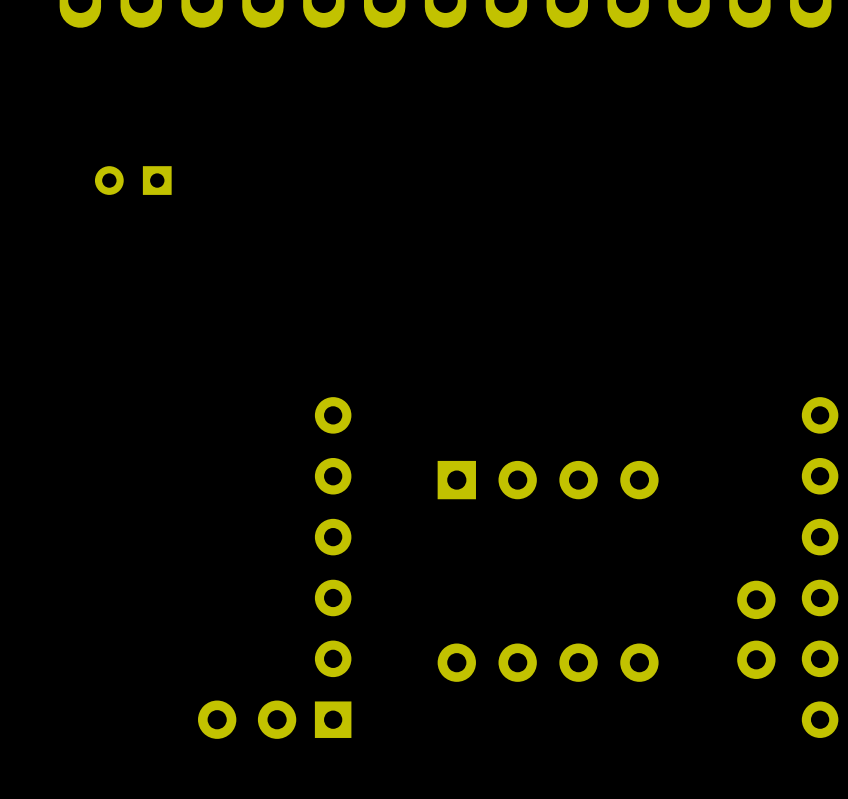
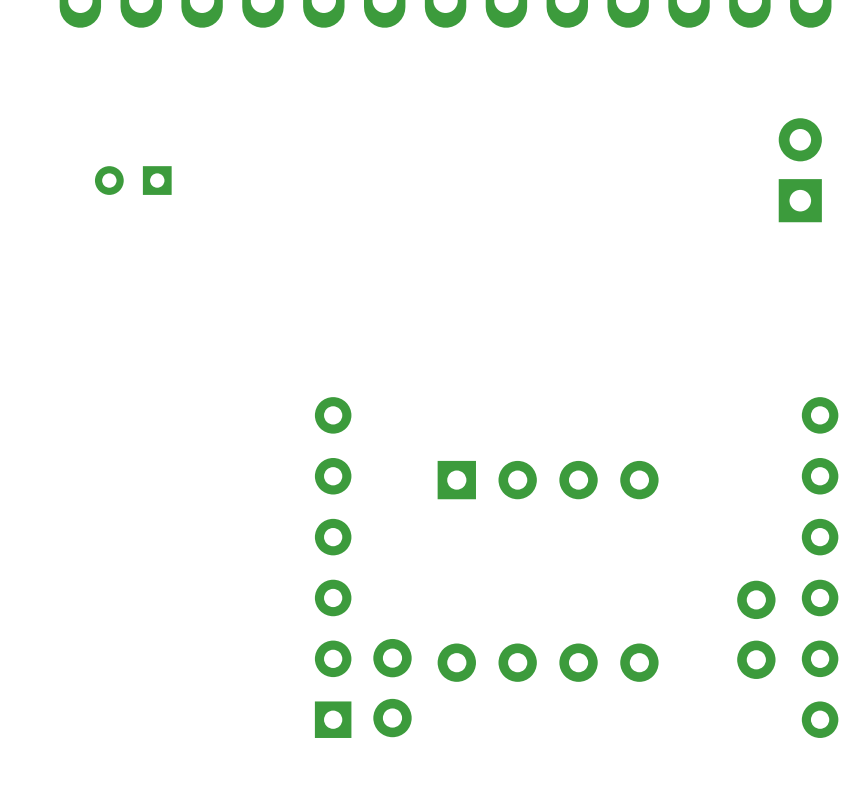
part: none -> (800, 170)
part rotation: 0° (247, 719) -> 90° clockwise (392, 688)
part position: (247, 719) -> (392, 688)

